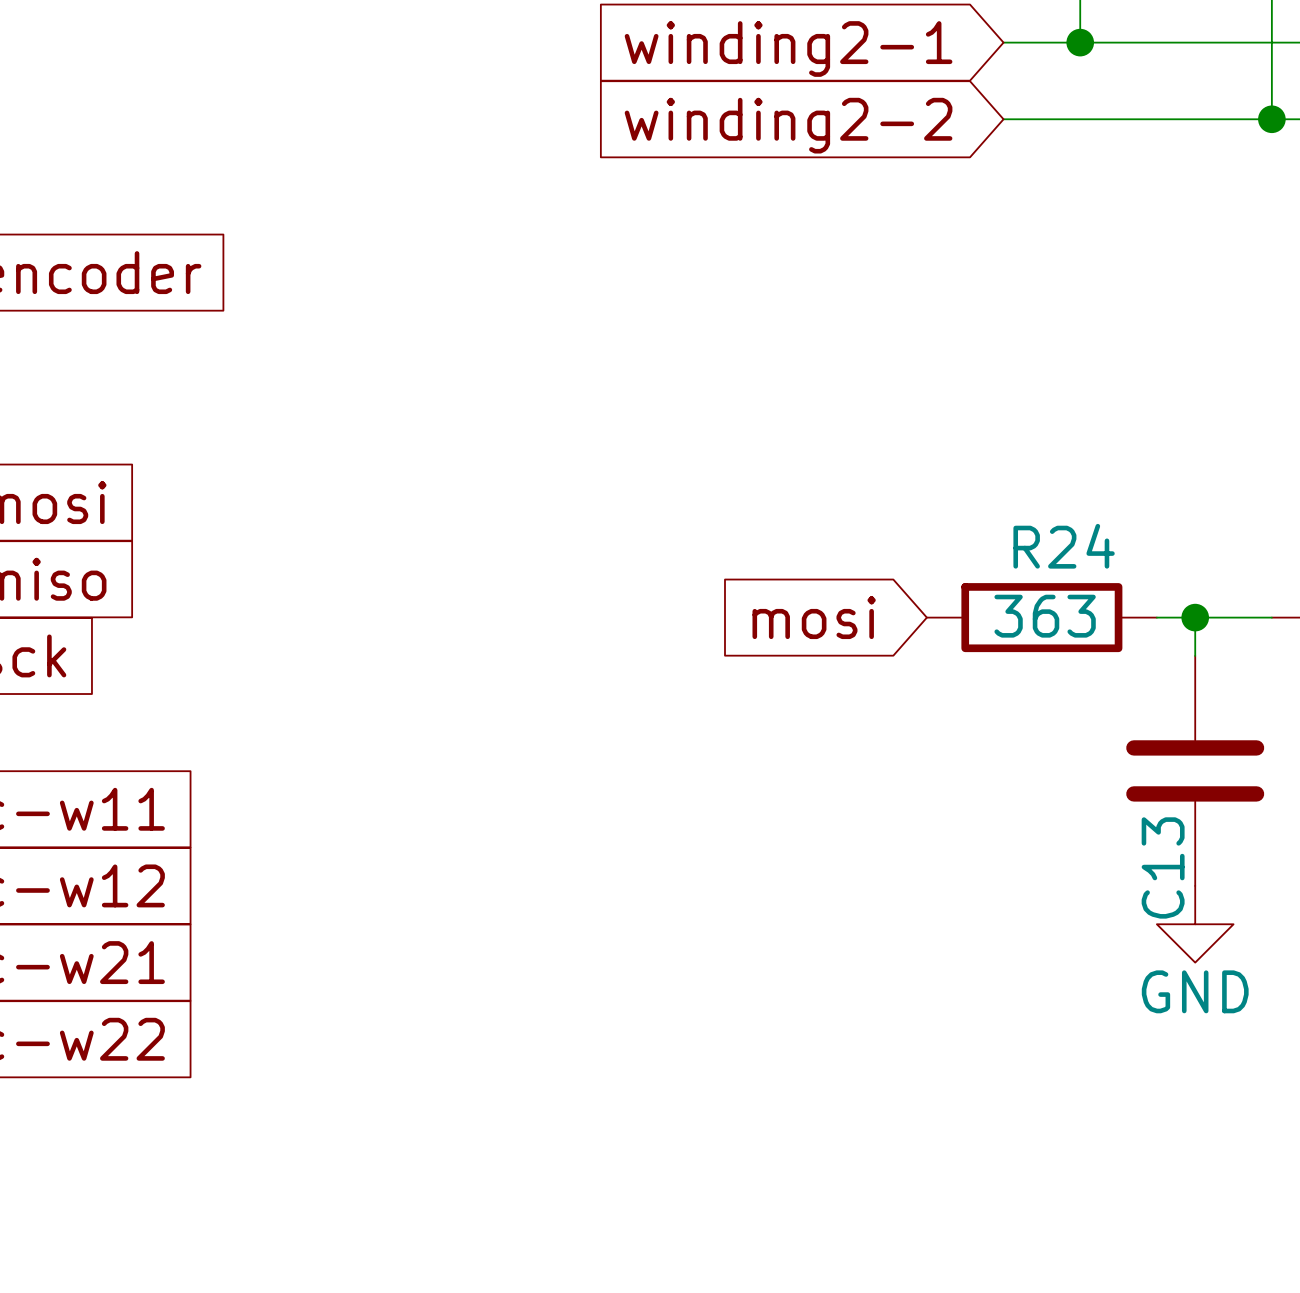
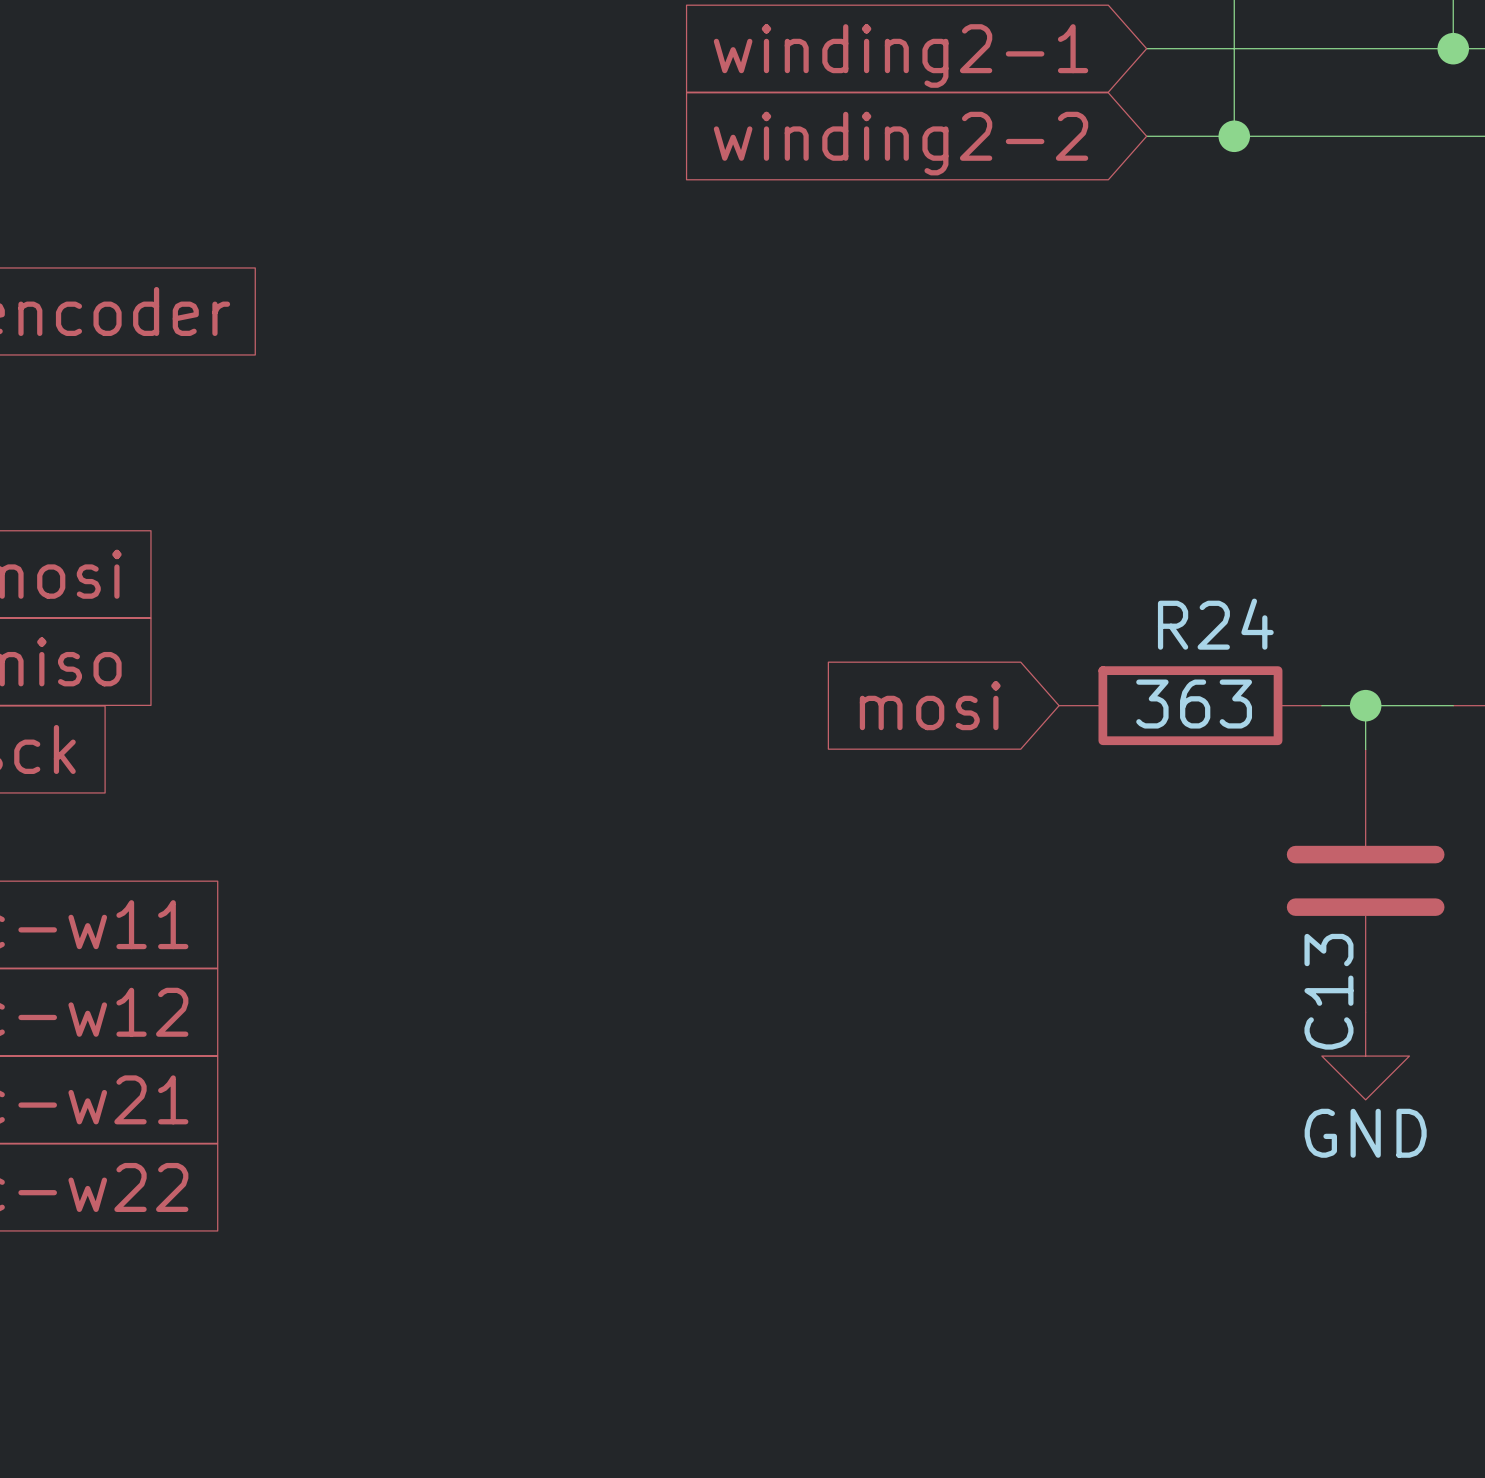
junction position: (1080, 42) -> (1234, 136)
wire: (1271, 42) (1271, 119) -> (1234, 48) (1234, 136)
junction position: (1271, 119) -> (1453, 48)

